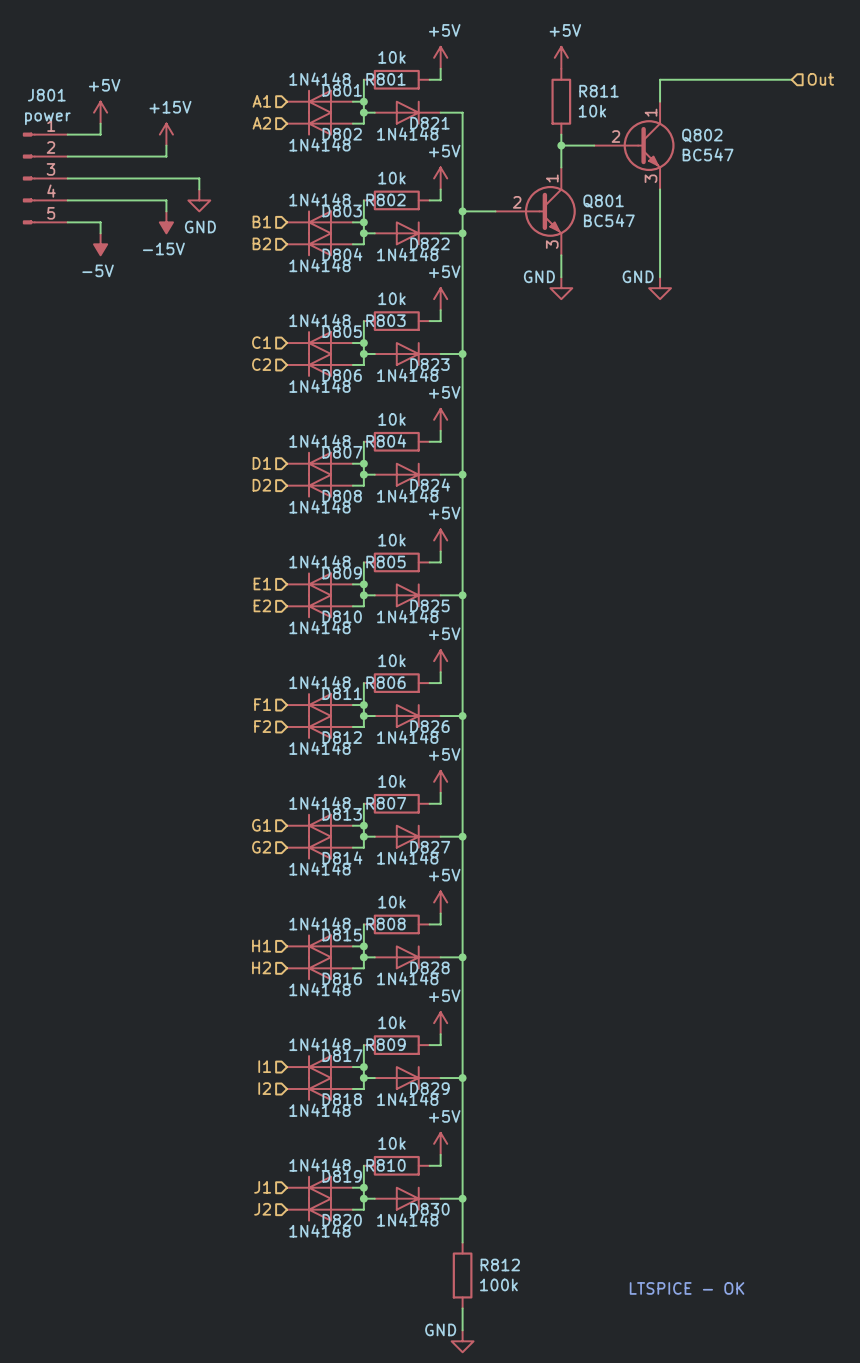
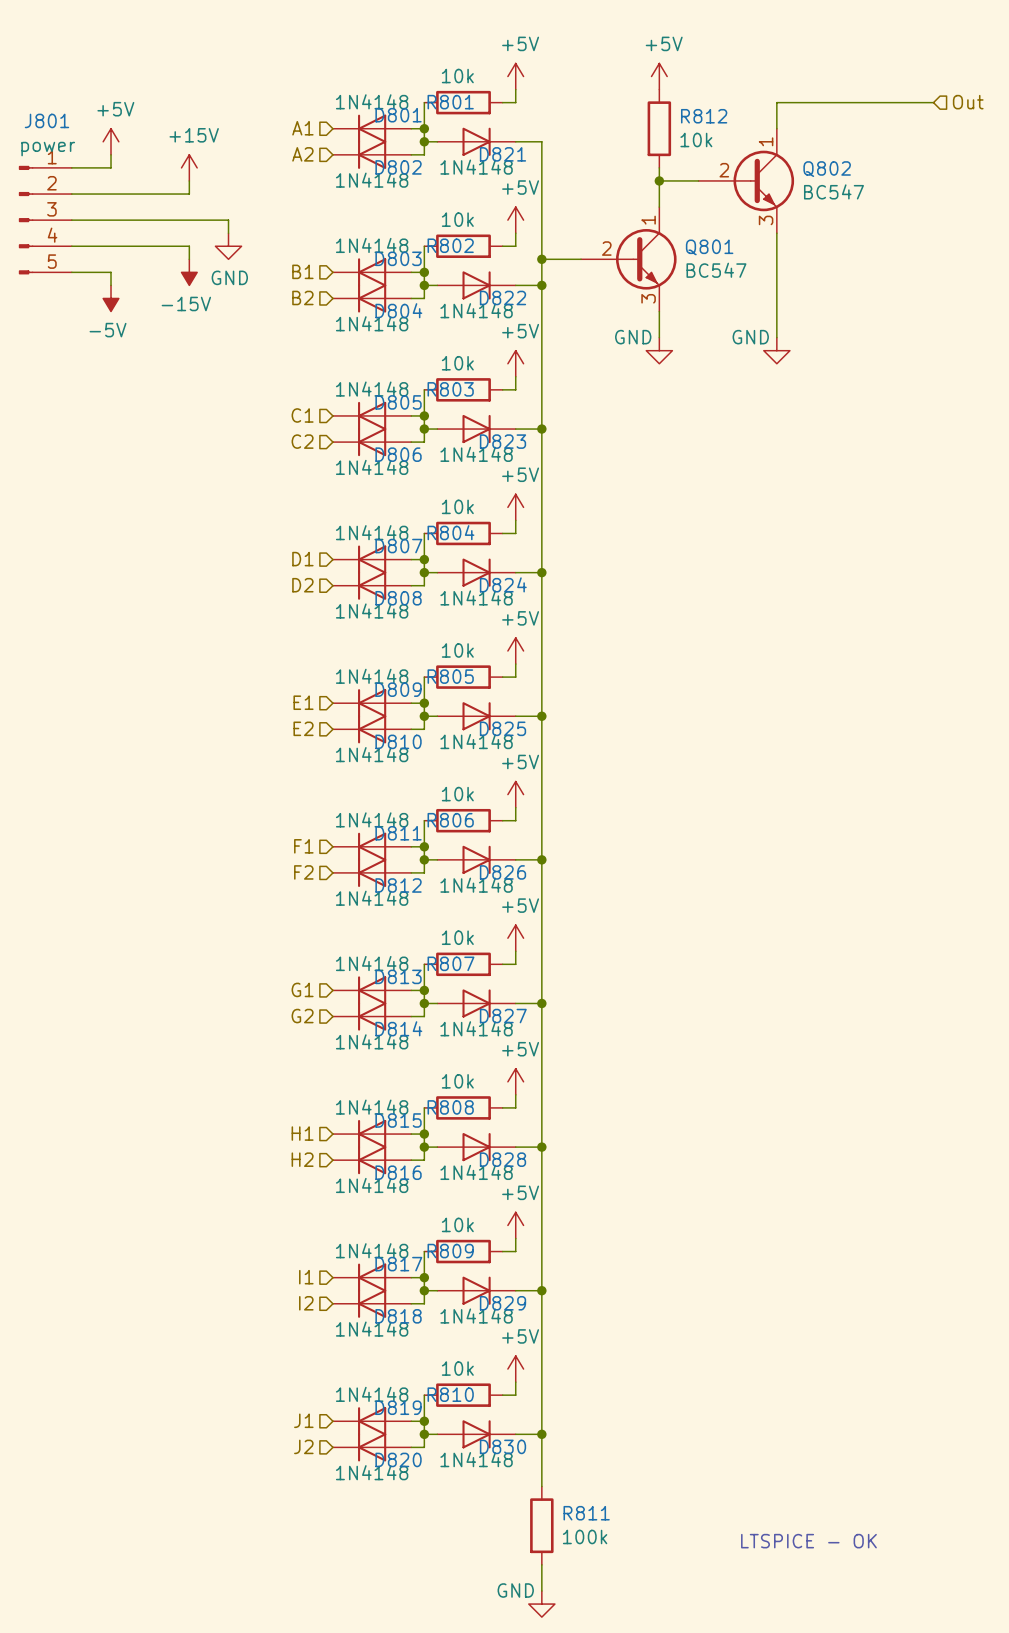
R811 name: R811 (598, 91) -> R812 (704, 116)
R812 name: R812 (500, 1264) -> R811 (586, 1513)

